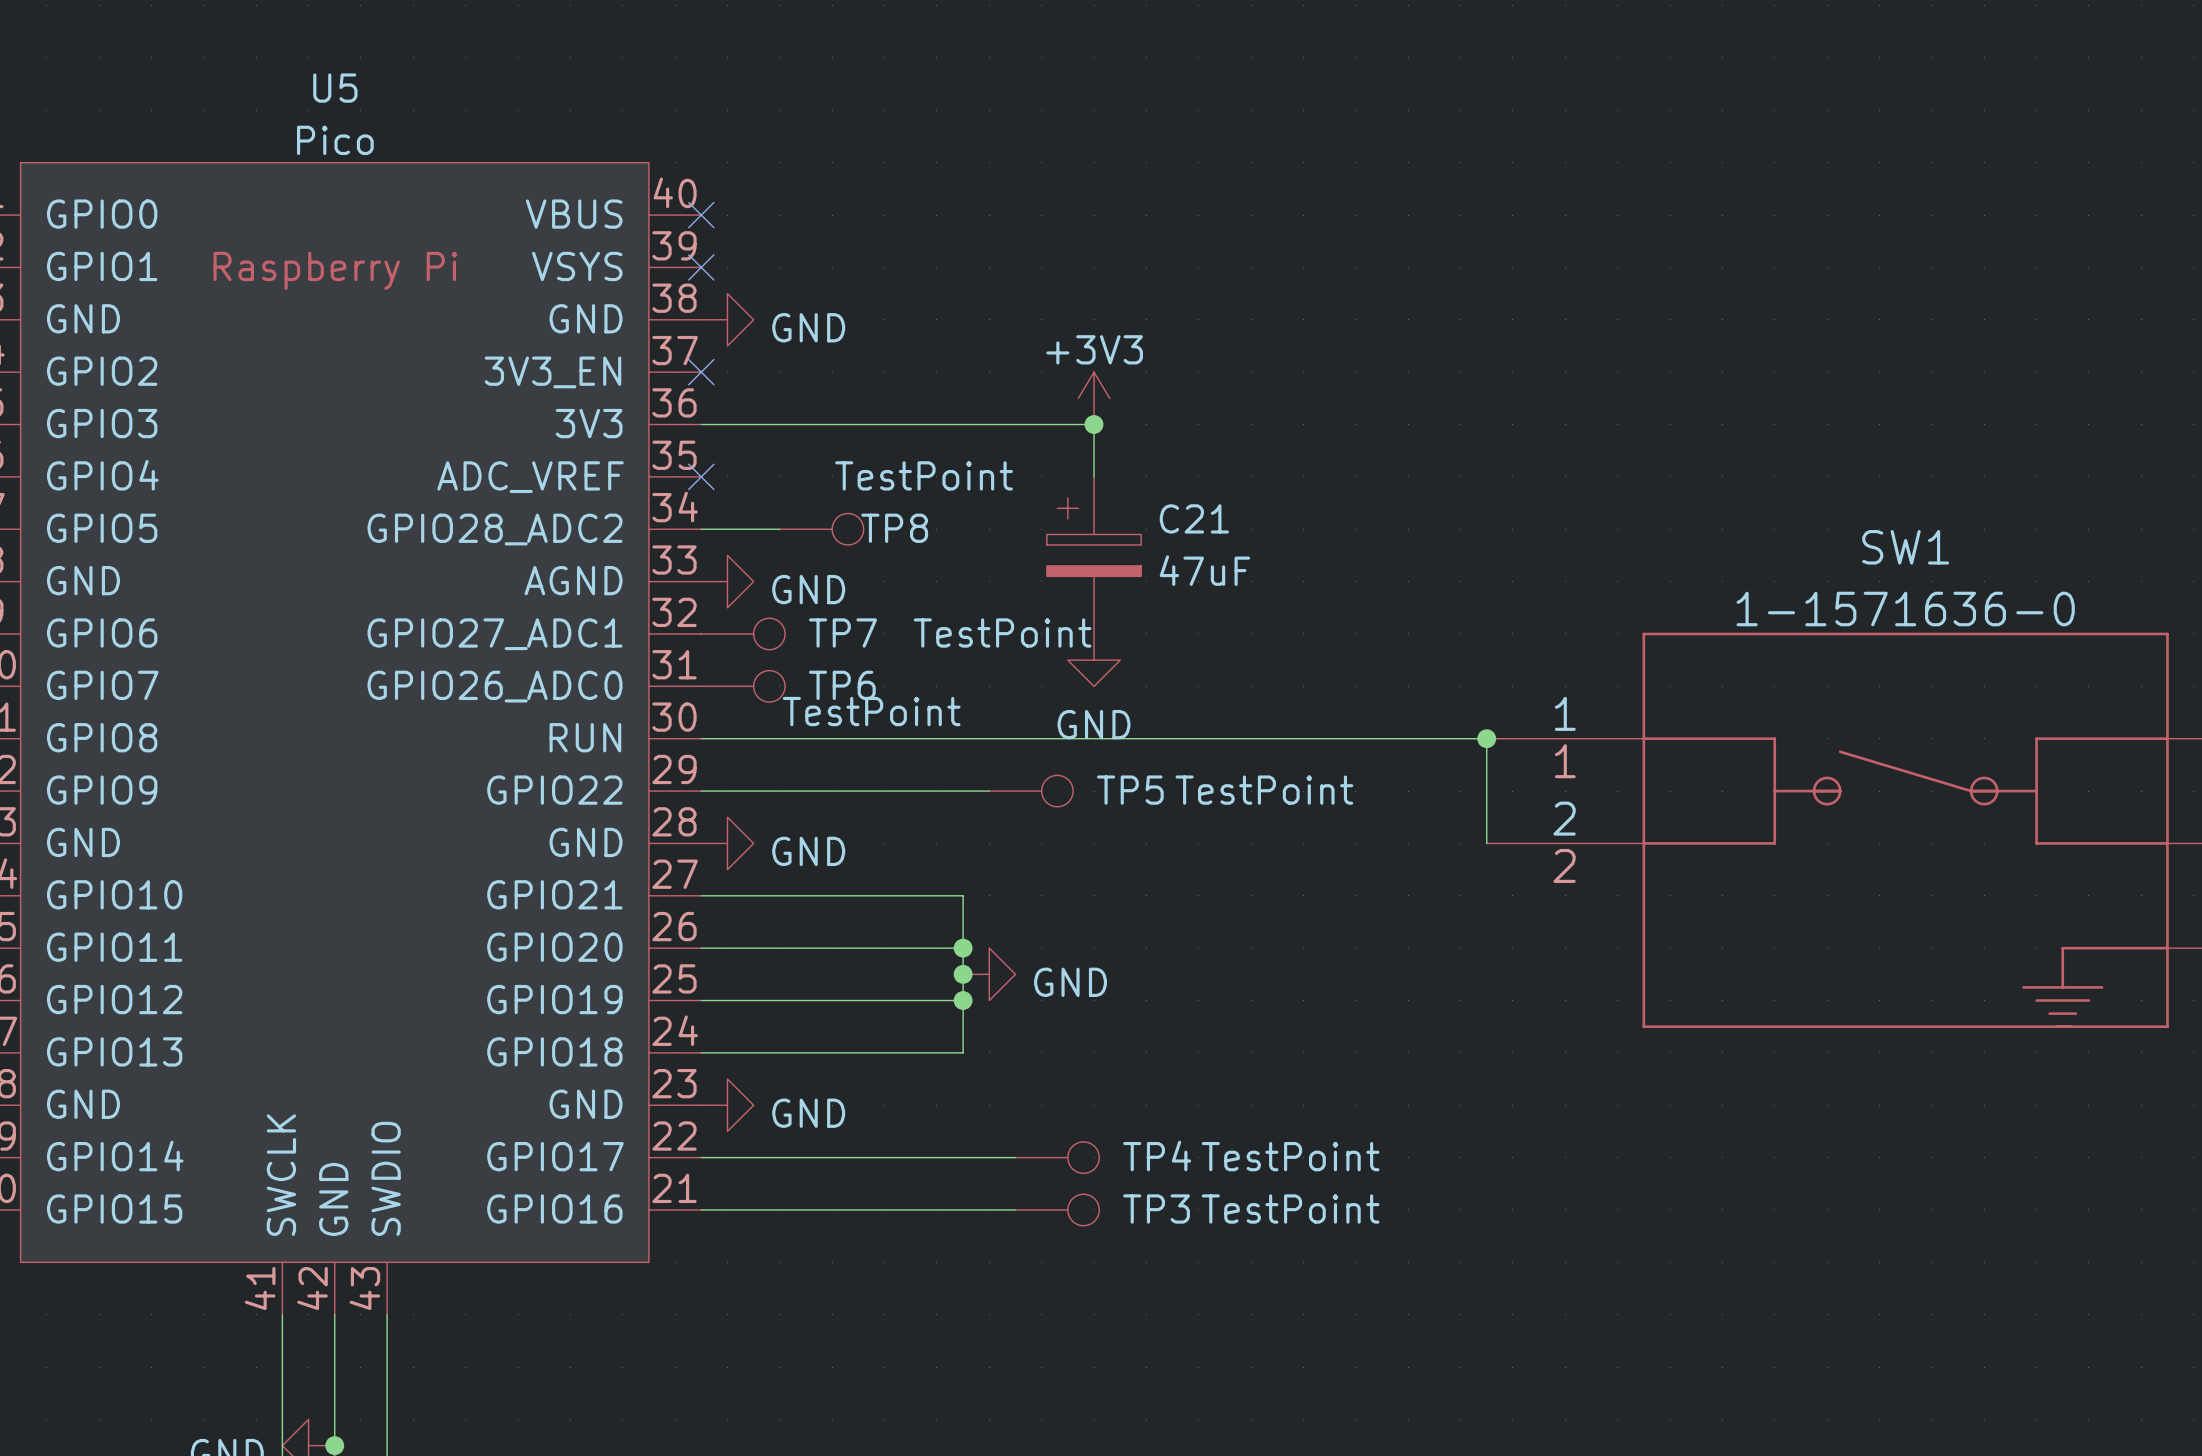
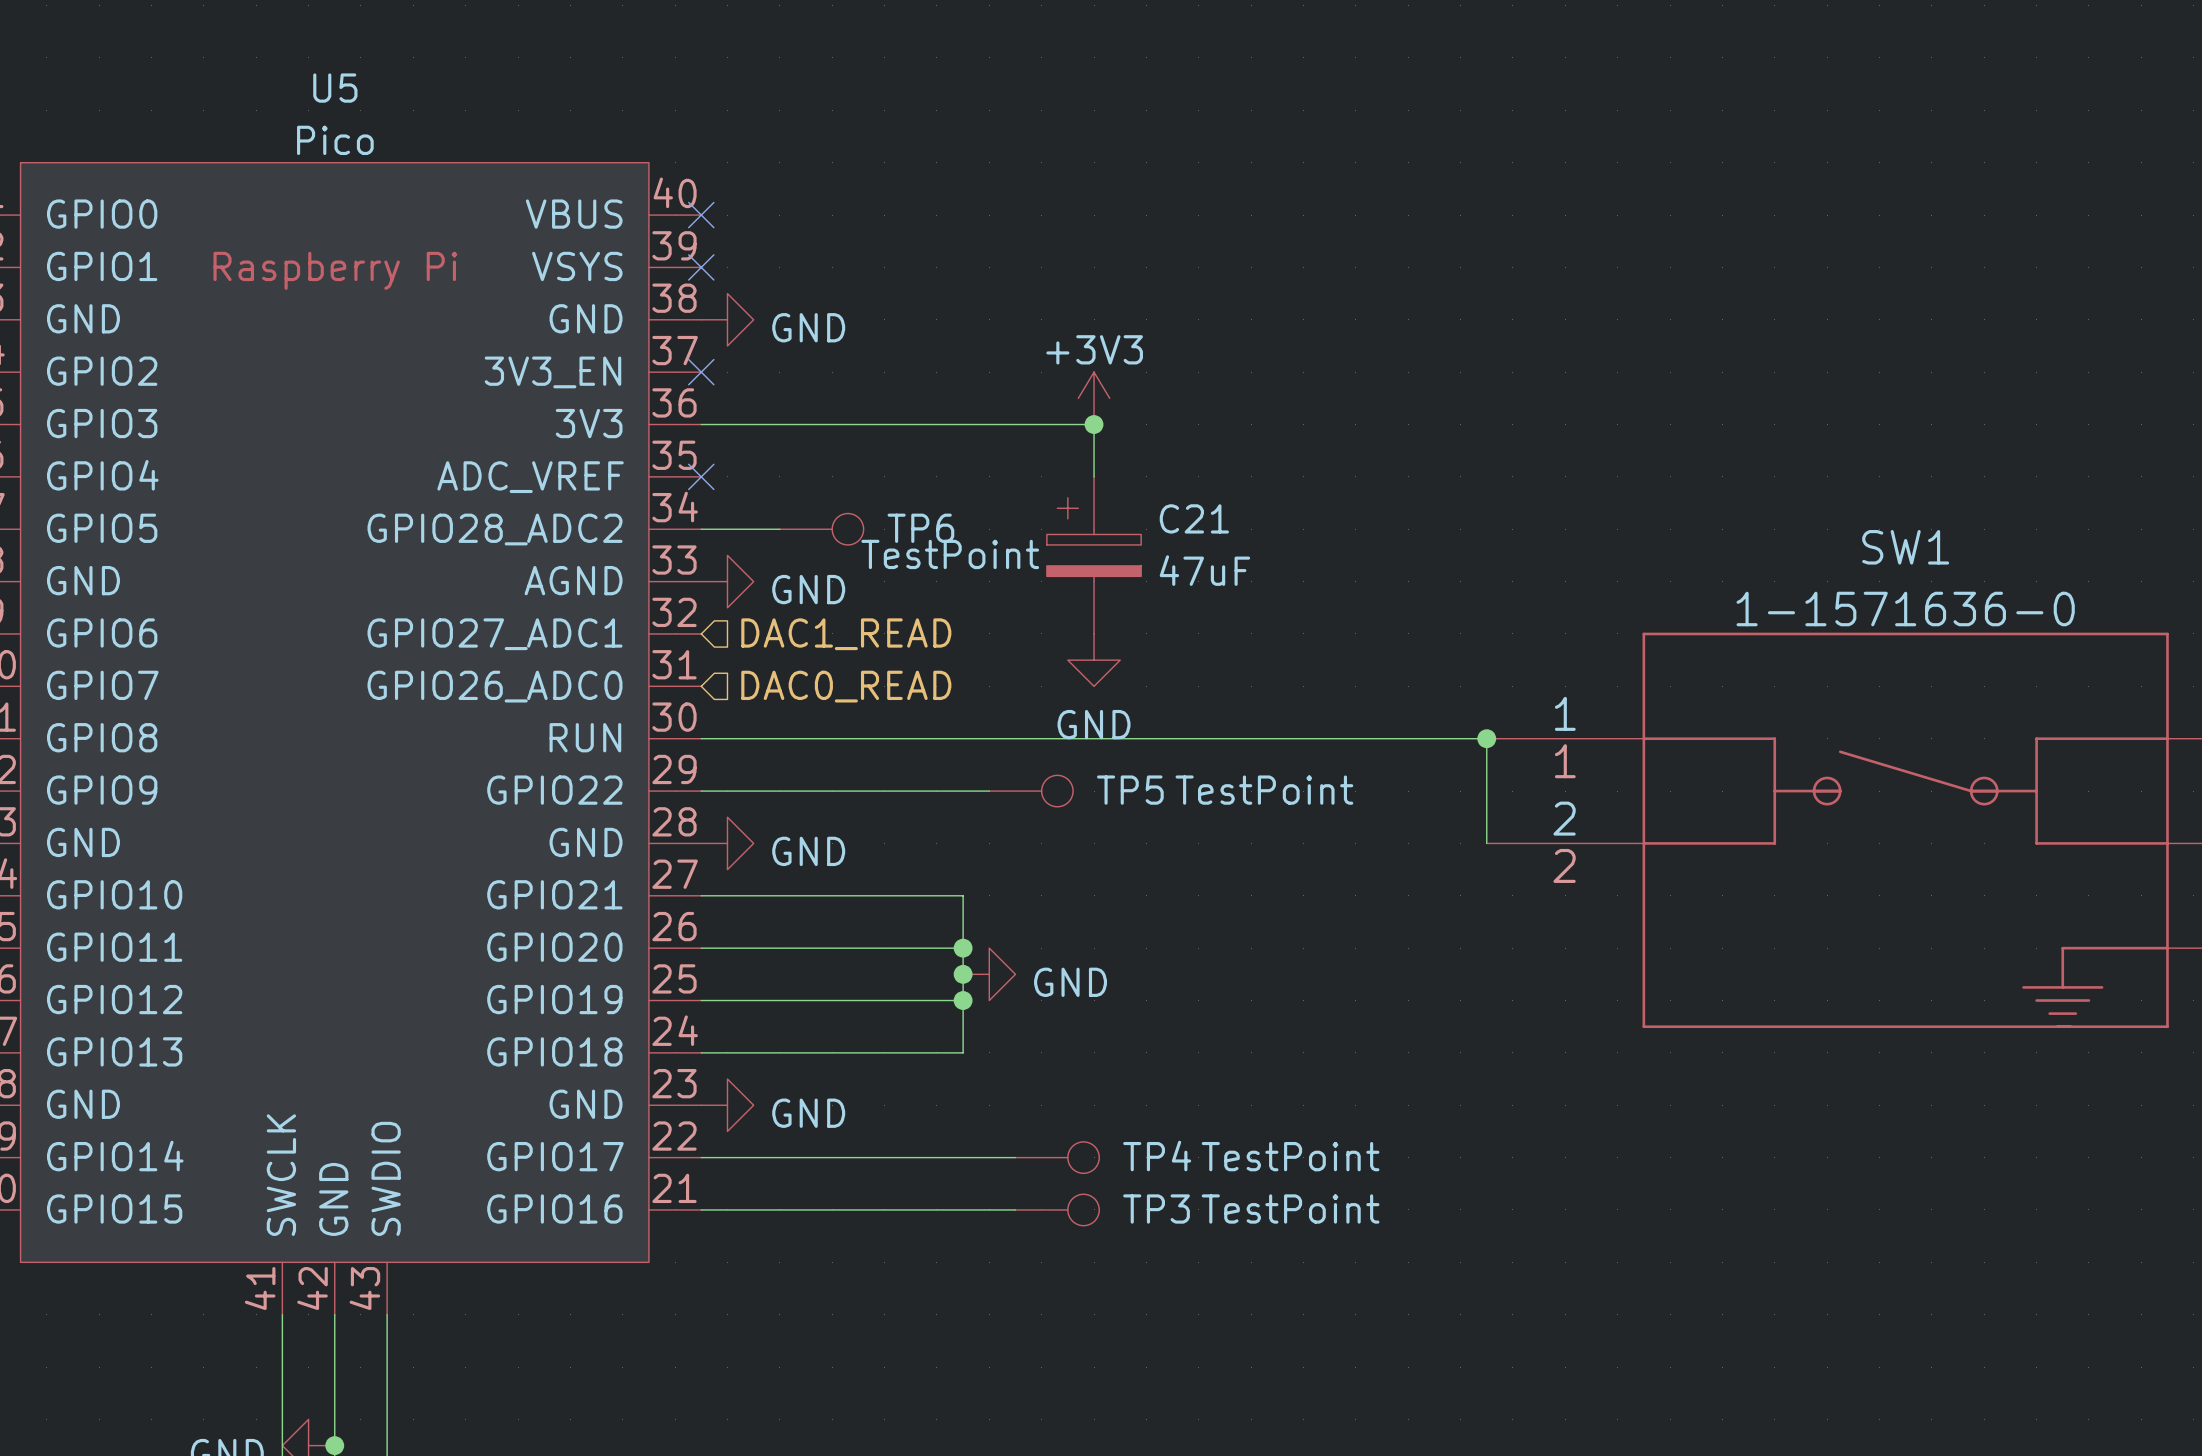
TP8 value position: TestPoint (924, 475) -> TestPoint (950, 554)
TP8 name: TP8 (894, 528) -> TP6 (920, 528)
TP7: TestPoint (743, 633) -> none
hierarchical label: none -> DAC1_READ (846, 634)
TP6: TestPoint (743, 686) -> none
hierarchical label: none -> DAC0_READ (846, 686)

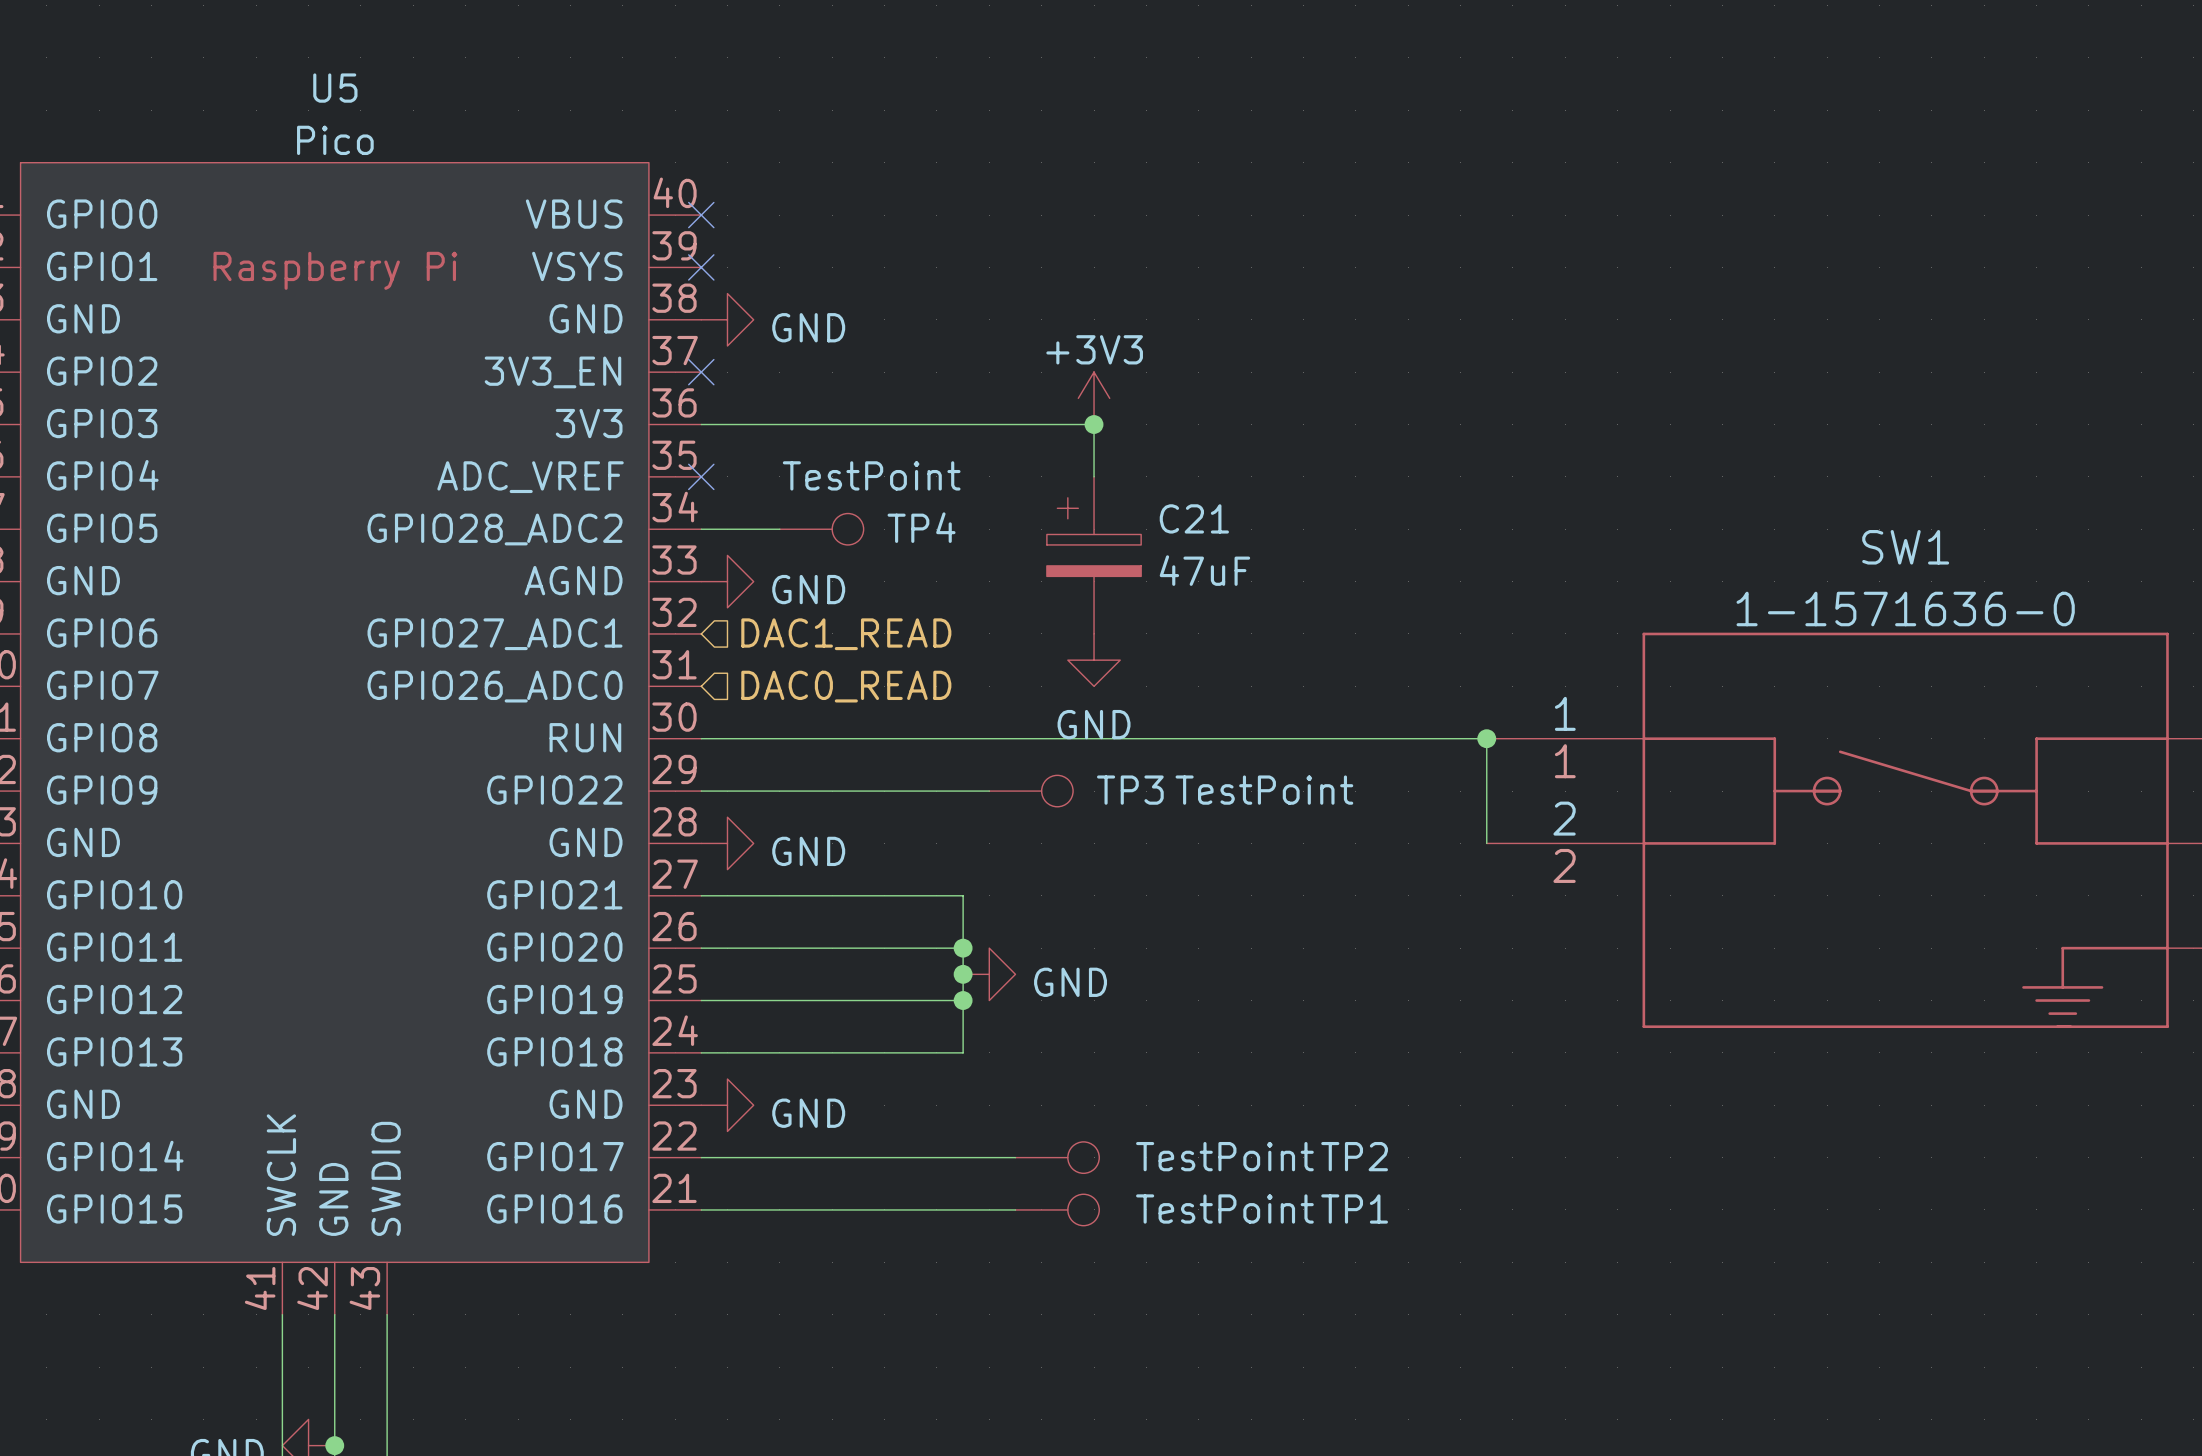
TP6 name: TP6 (920, 528) -> TP4 (921, 527)
TP6 value position: TestPoint (950, 554) -> TestPoint (871, 475)
TP5 name: TP5 (1130, 790) -> TP3 (1130, 790)
TP4 name: TP4 (1157, 1156) -> TP2 (1354, 1156)
TP4 value position: TestPoint (1290, 1156) -> TestPoint (1224, 1156)
TP3 name: TP3 (1156, 1209) -> TP1 (1354, 1209)
TP3 value position: TestPoint (1290, 1209) -> TestPoint (1224, 1209)

